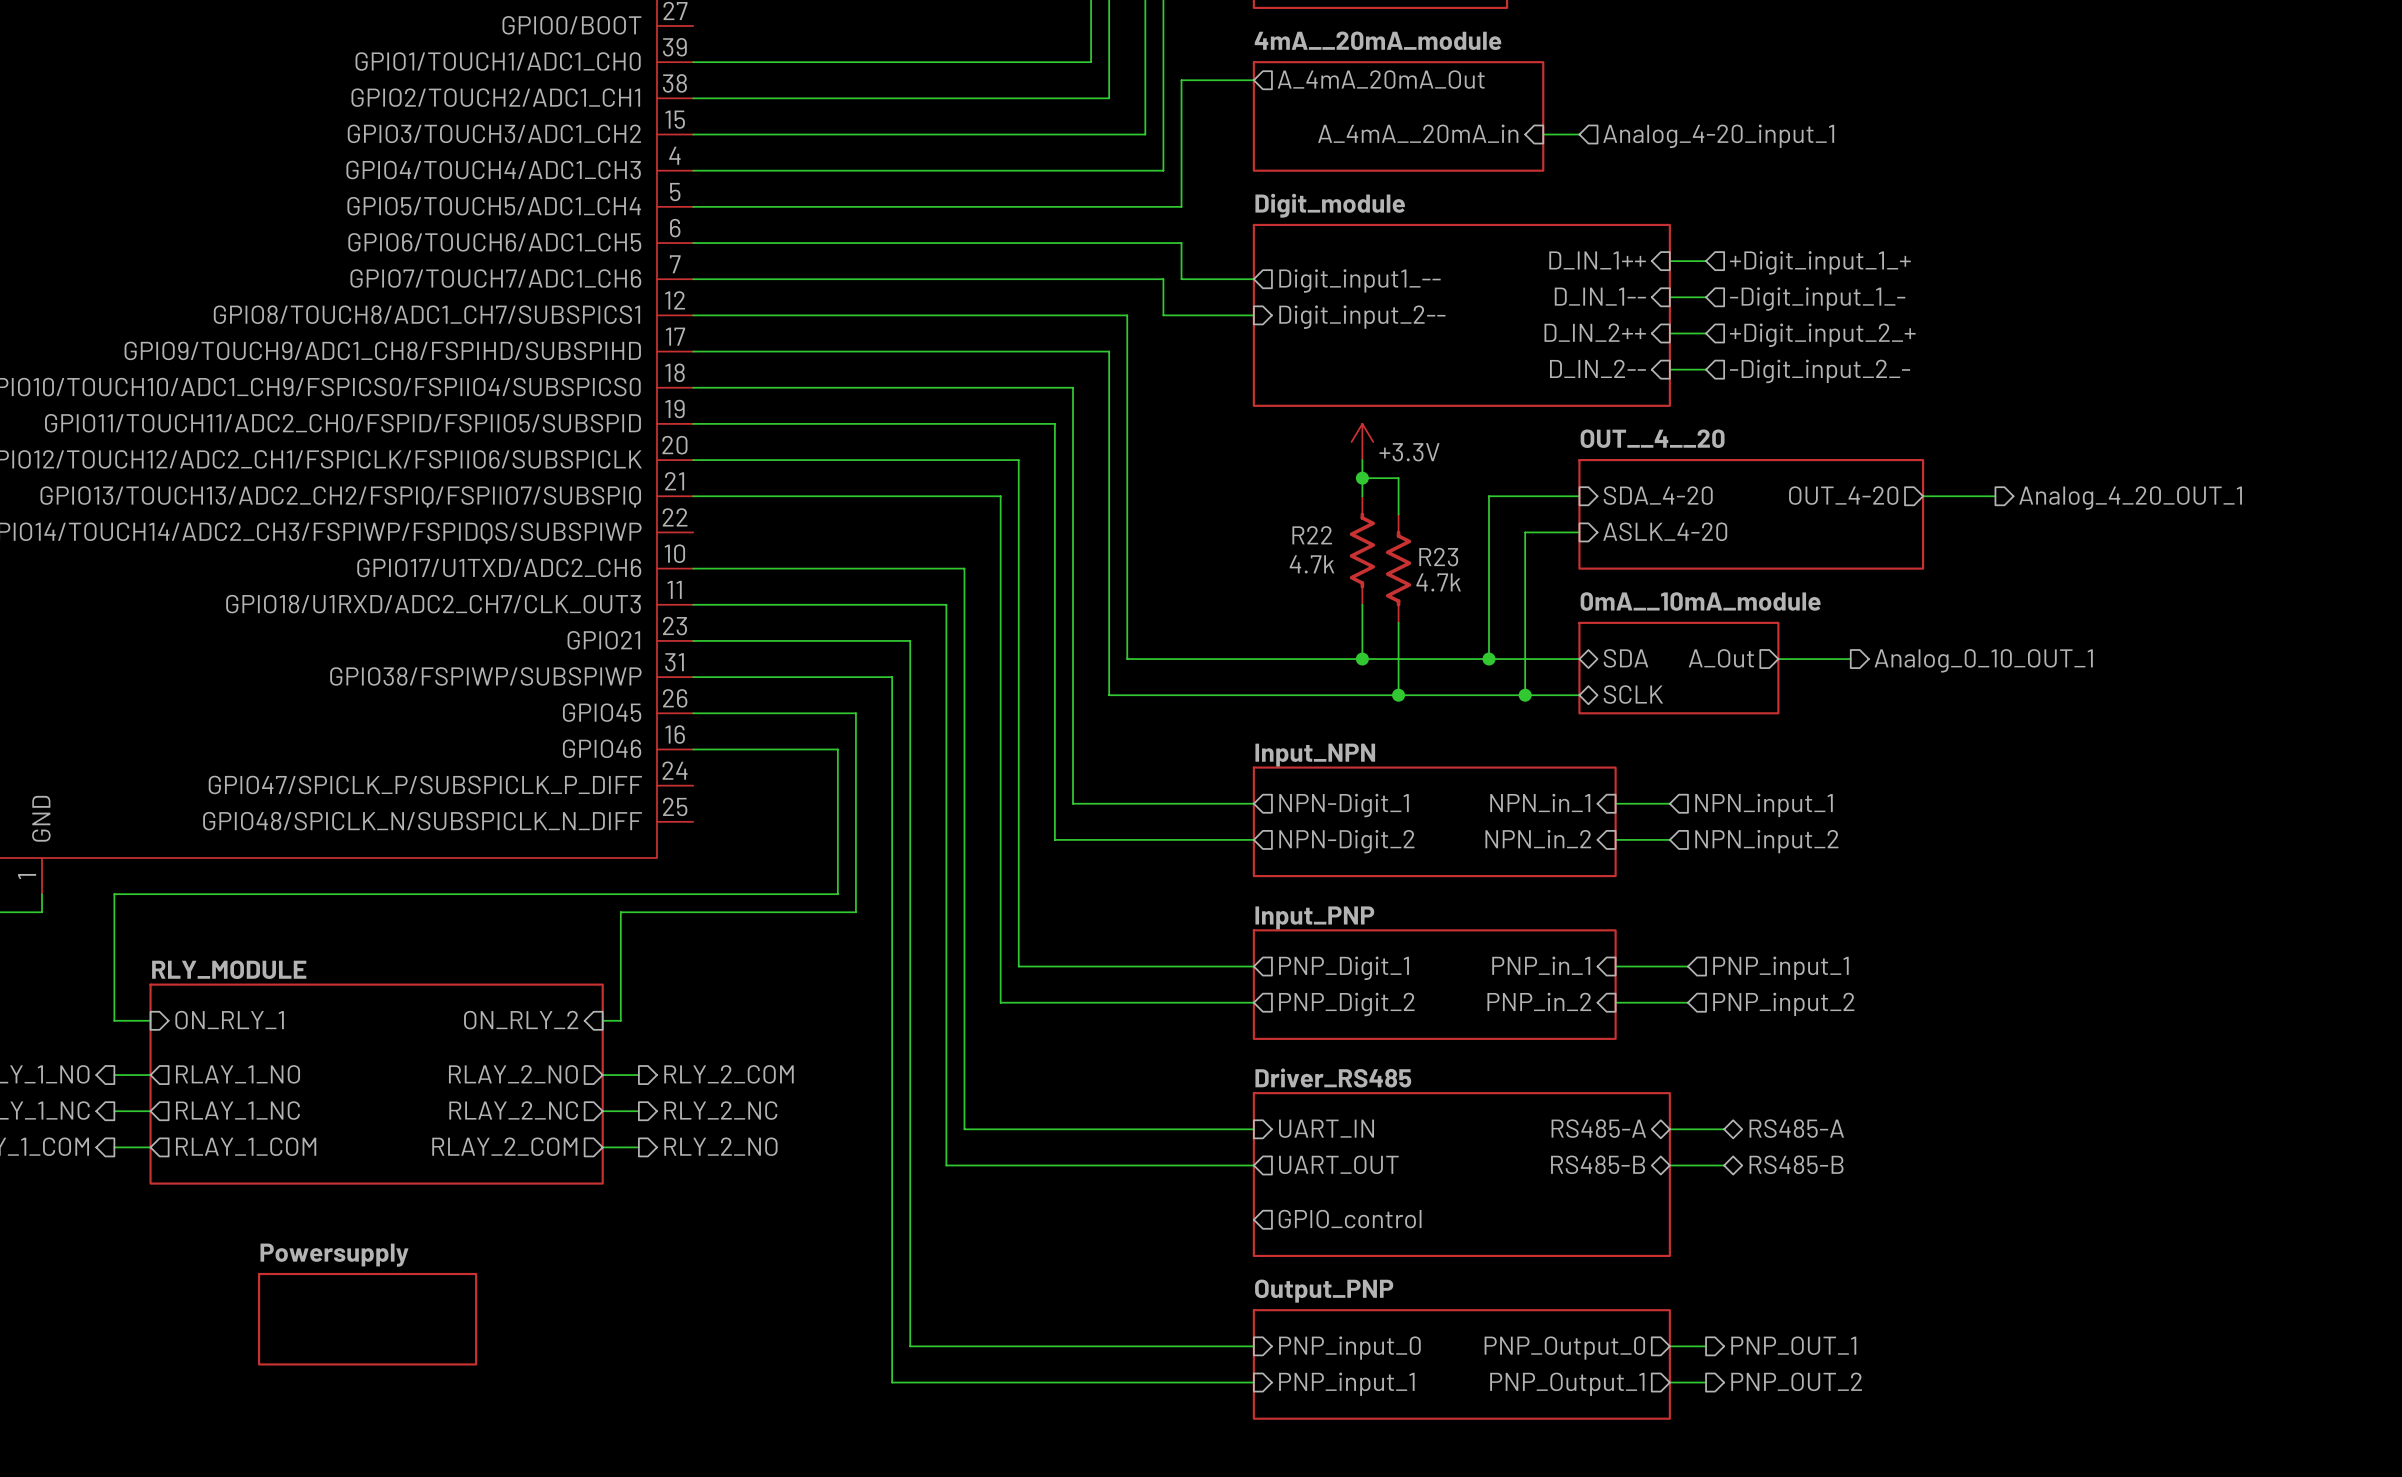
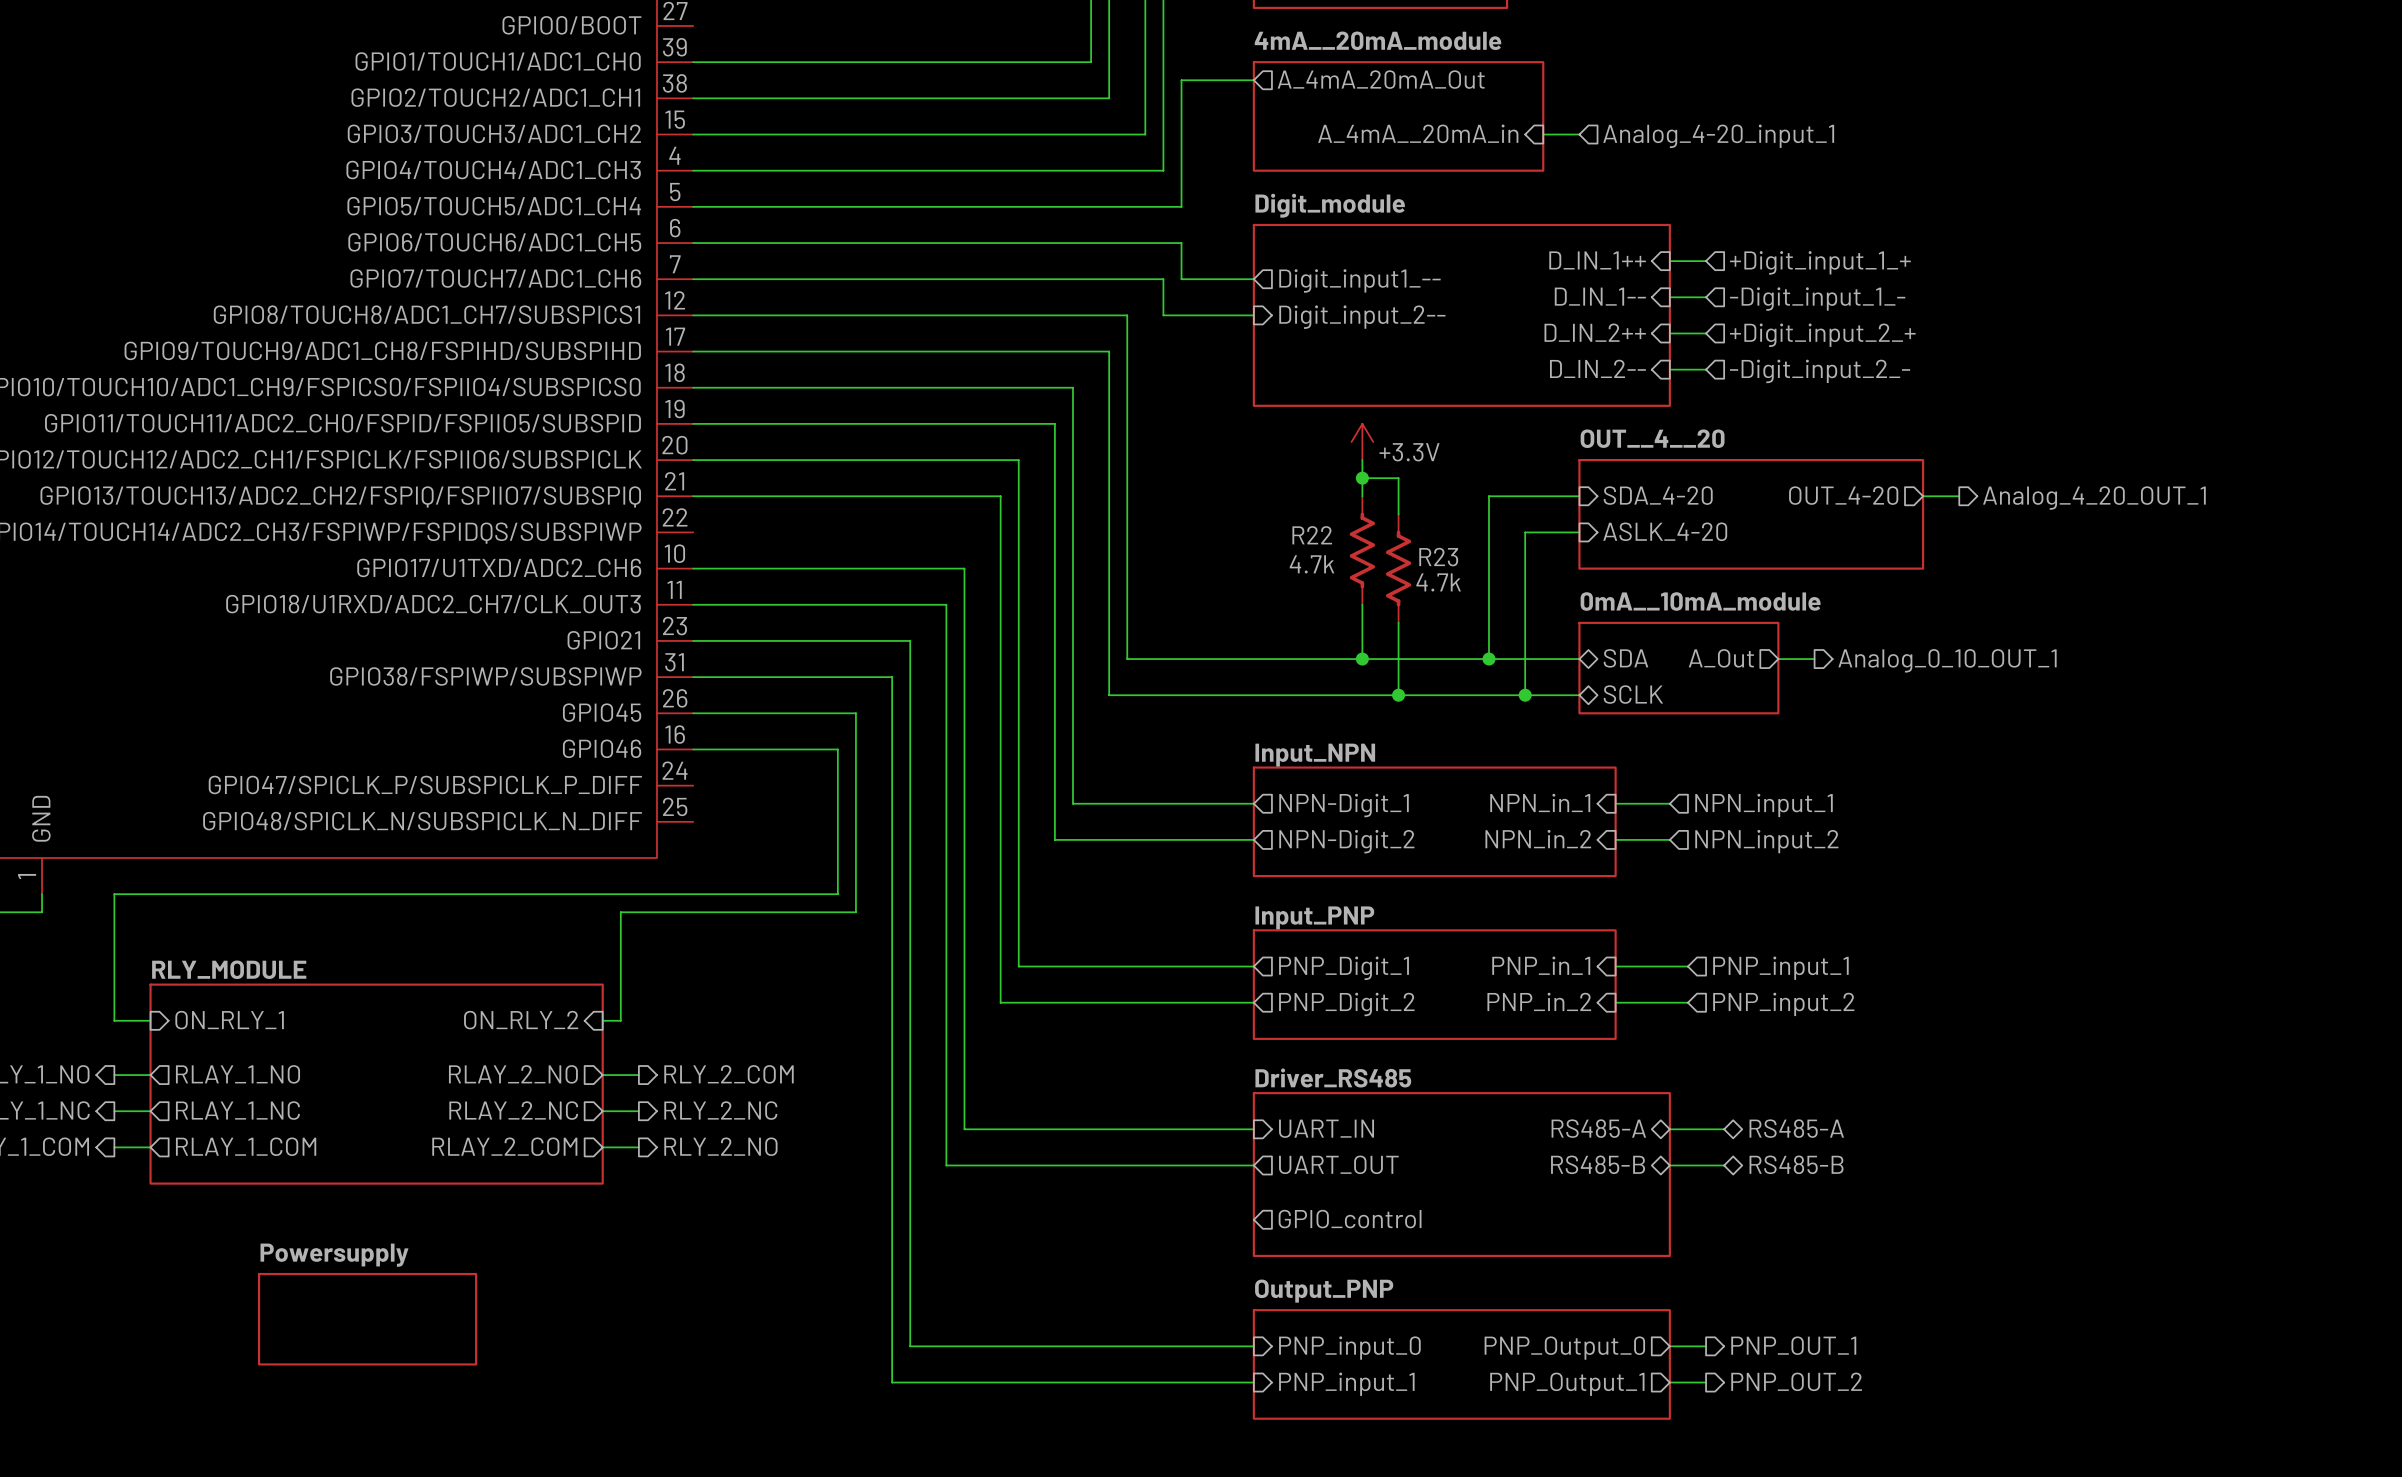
wire: (1959, 496) (1995, 496) -> none
hierarchical label position: Analog_4_20_OUT_1 (2130, 498) -> Analog_4_20_OUT_1 (2094, 498)
wire: (1814, 659) (1850, 659) -> none
hierarchical label position: Analog_0_10_OUT_1 (1983, 660) -> Analog_0_10_OUT_1 (1947, 660)

